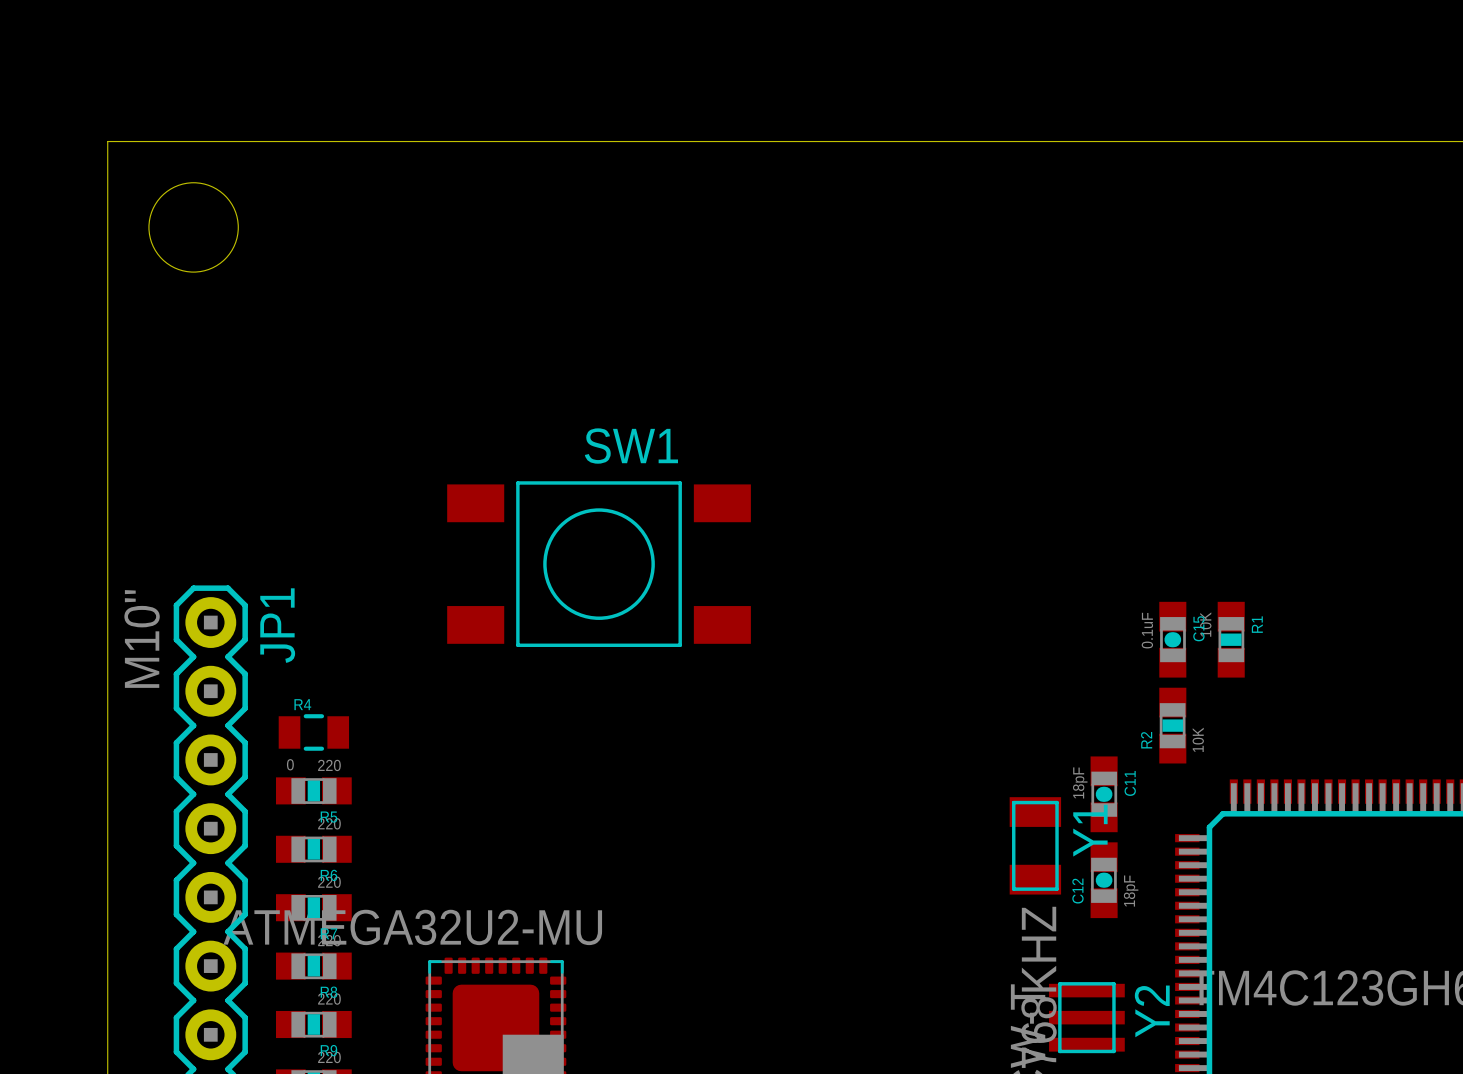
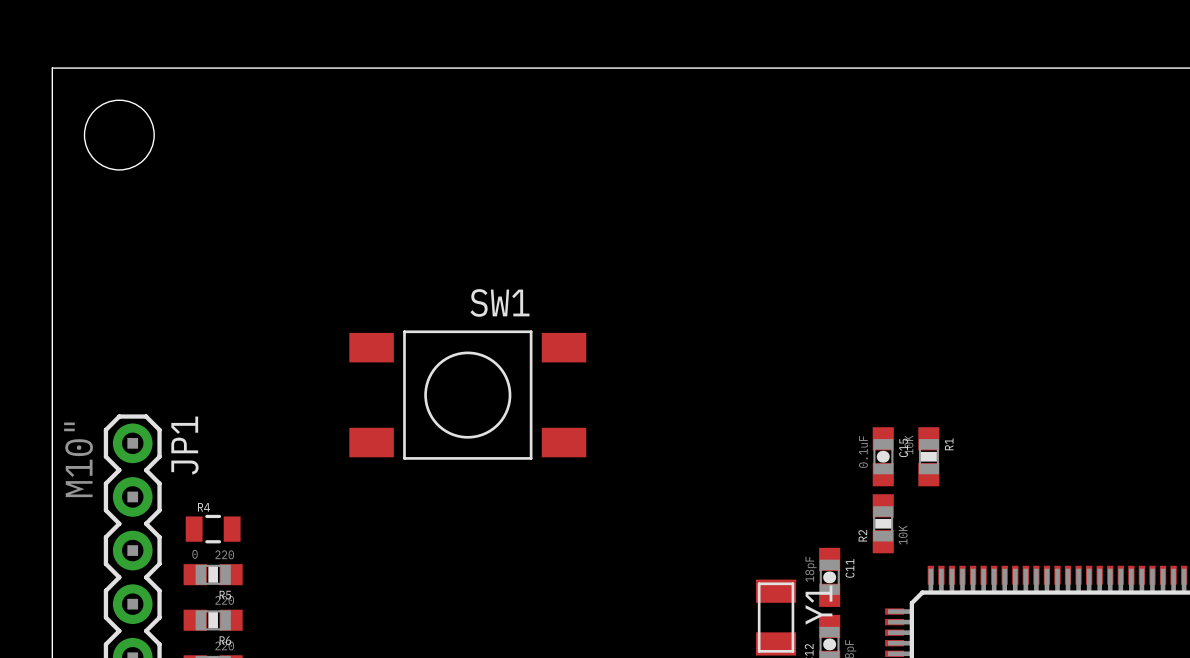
SW1 position: (599, 564) -> (467, 395)

